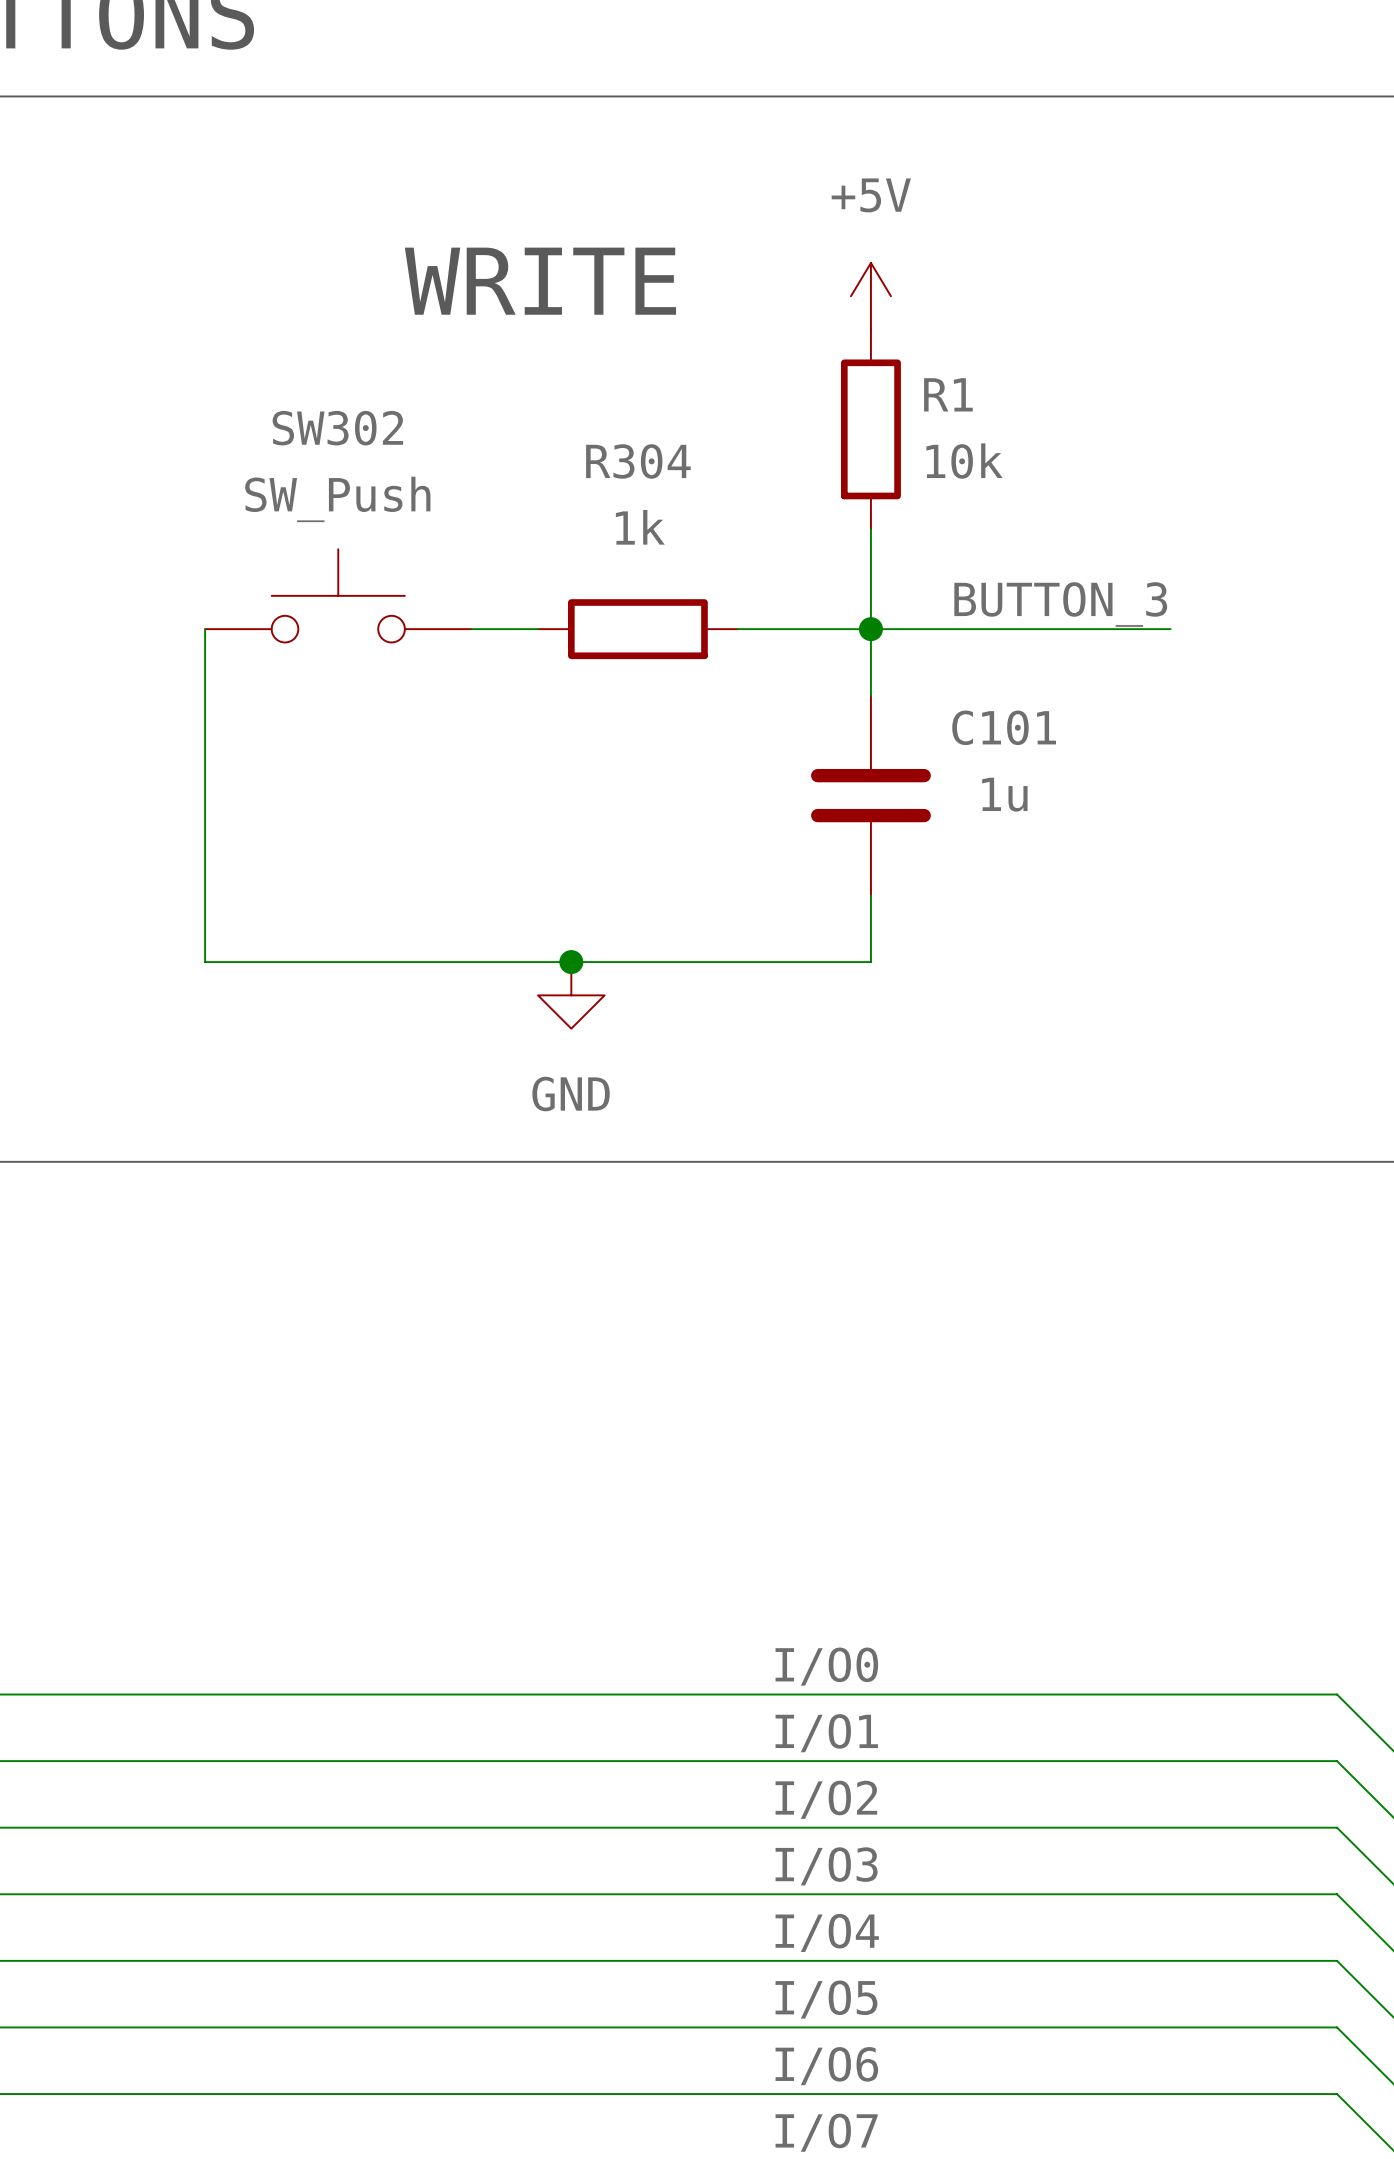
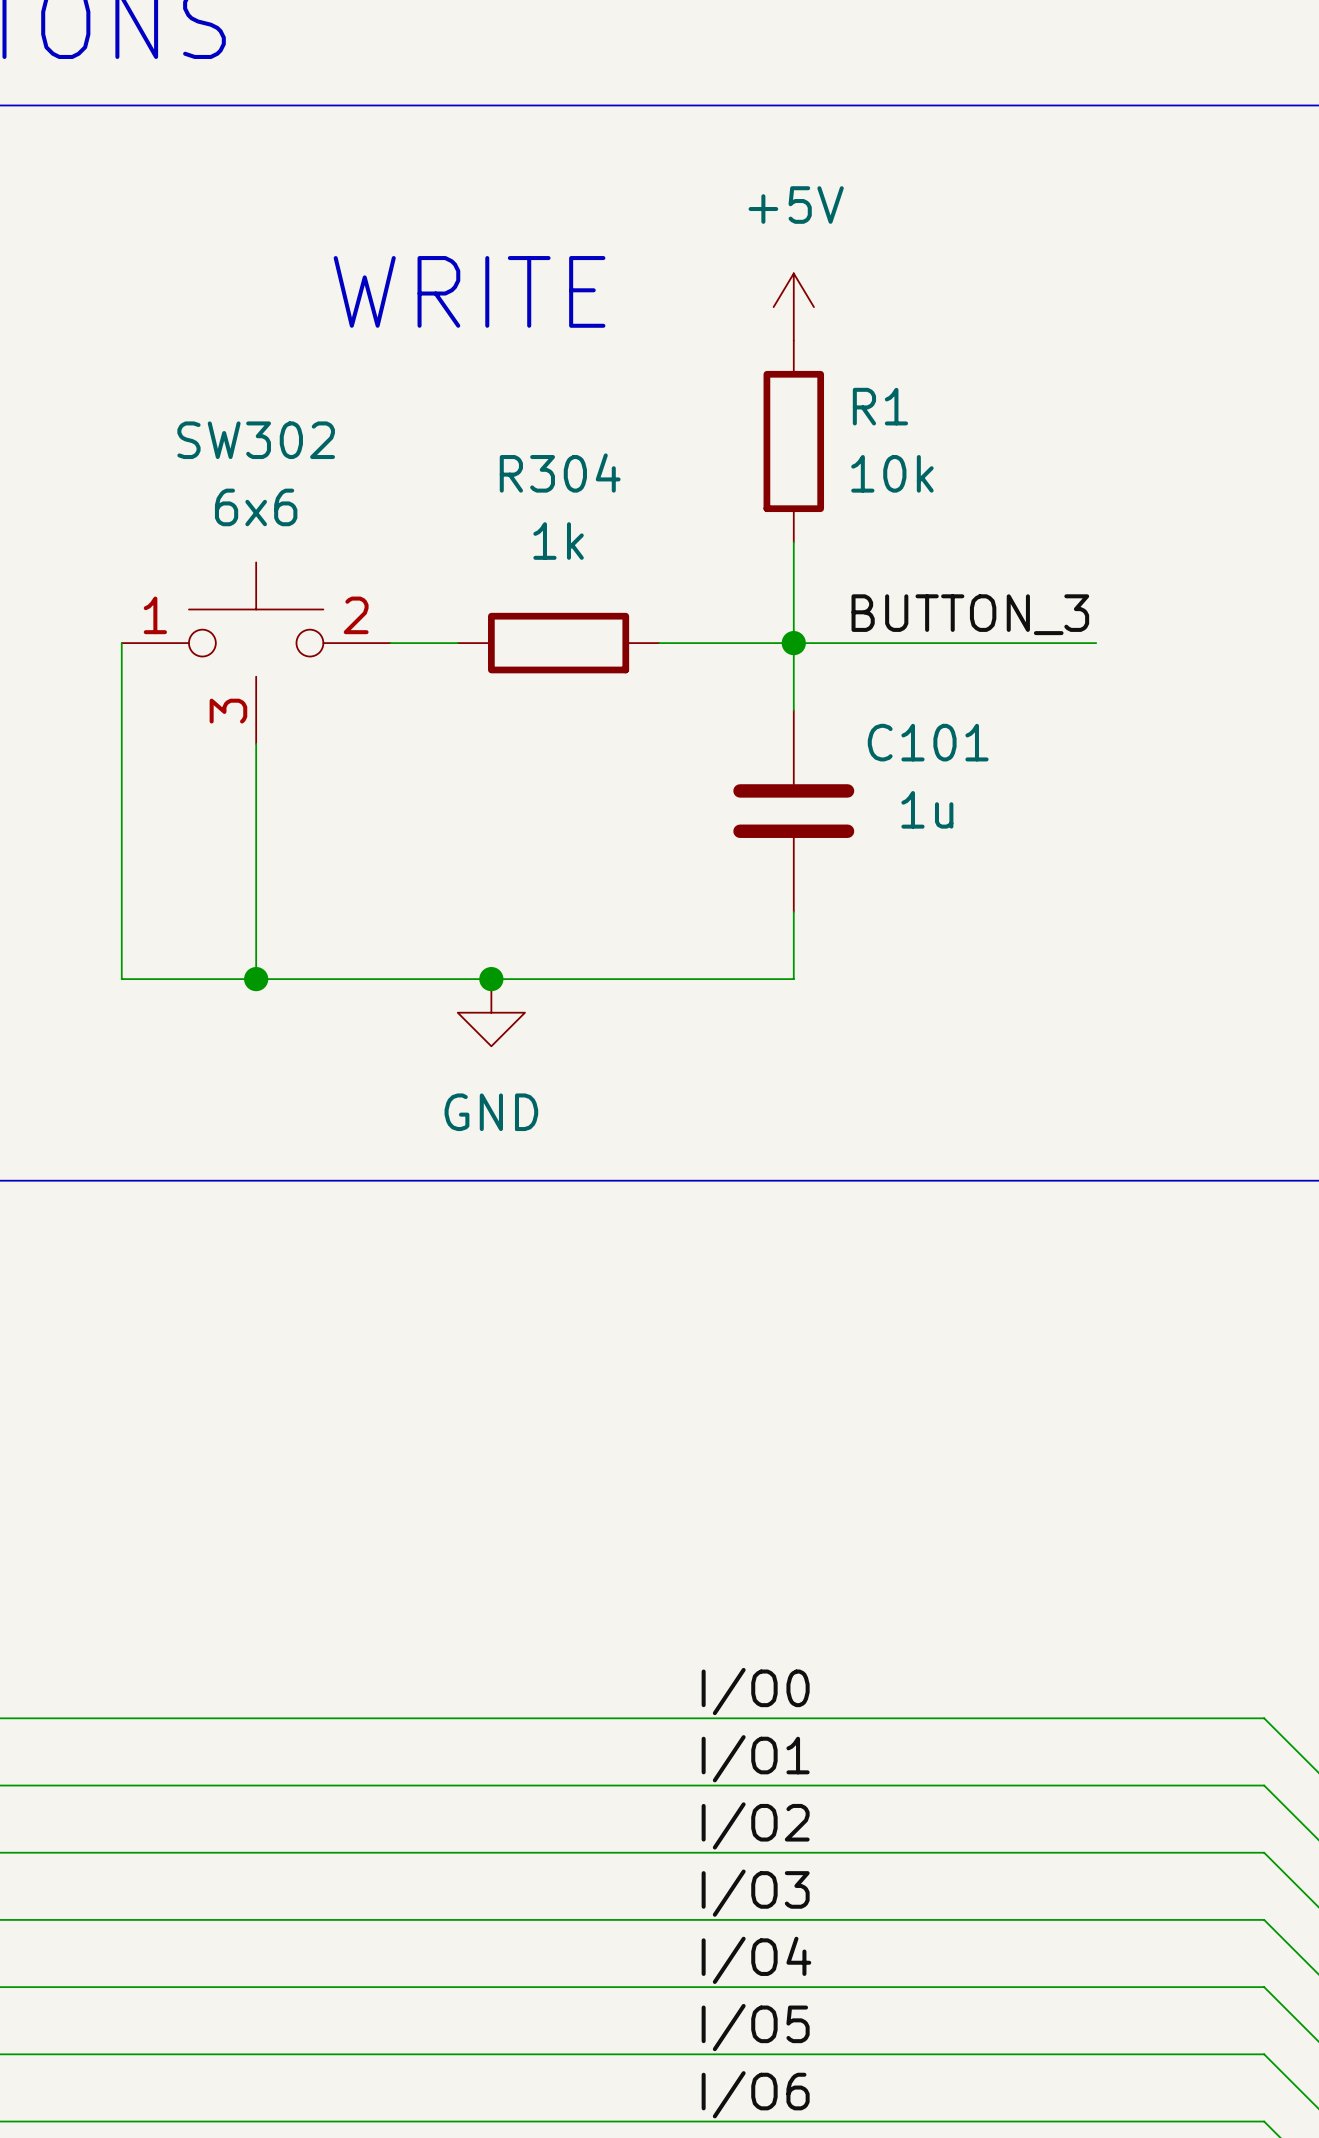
SW302 value: SW_Push (337, 499) -> 6x6 (256, 507)
SW302 symbol: [205, 549, 472, 643] -> [121, 562, 391, 744]
wire: none -> (256, 743) (256, 979)
junction: none -> (256, 979)

